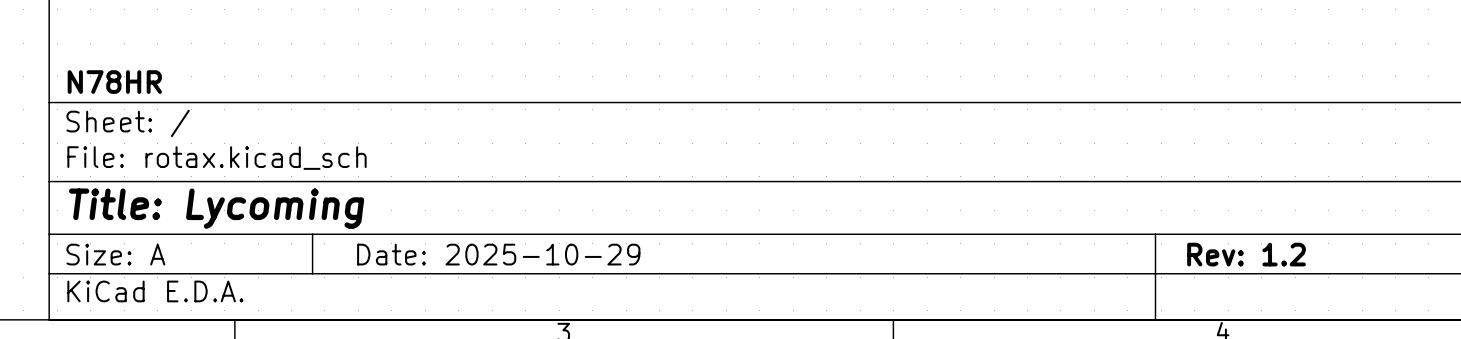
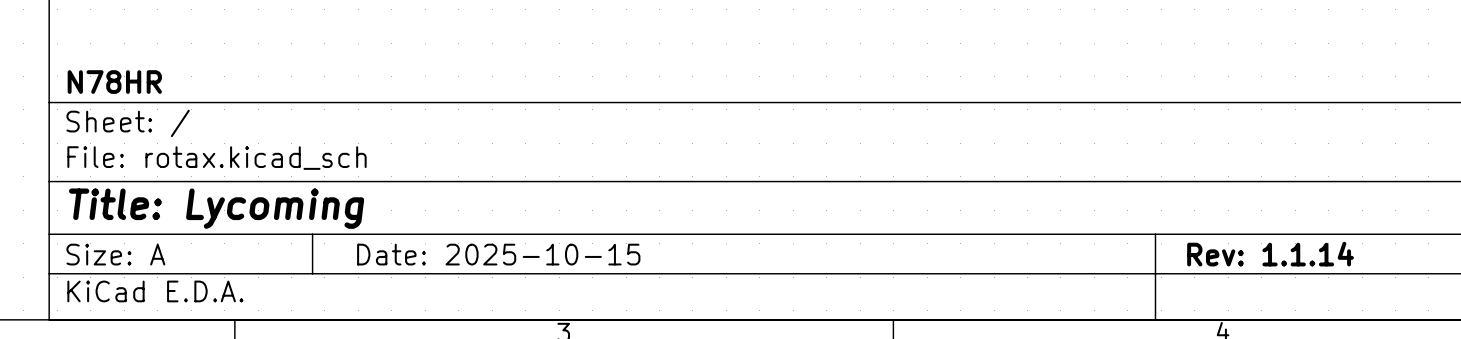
title block: Date: 2025-10-29 (498, 254) -> Date: 2025-10-15 (498, 254)
title block: Rev: 1.2 (1246, 254) -> Rev: 1.1.14 (1270, 254)

